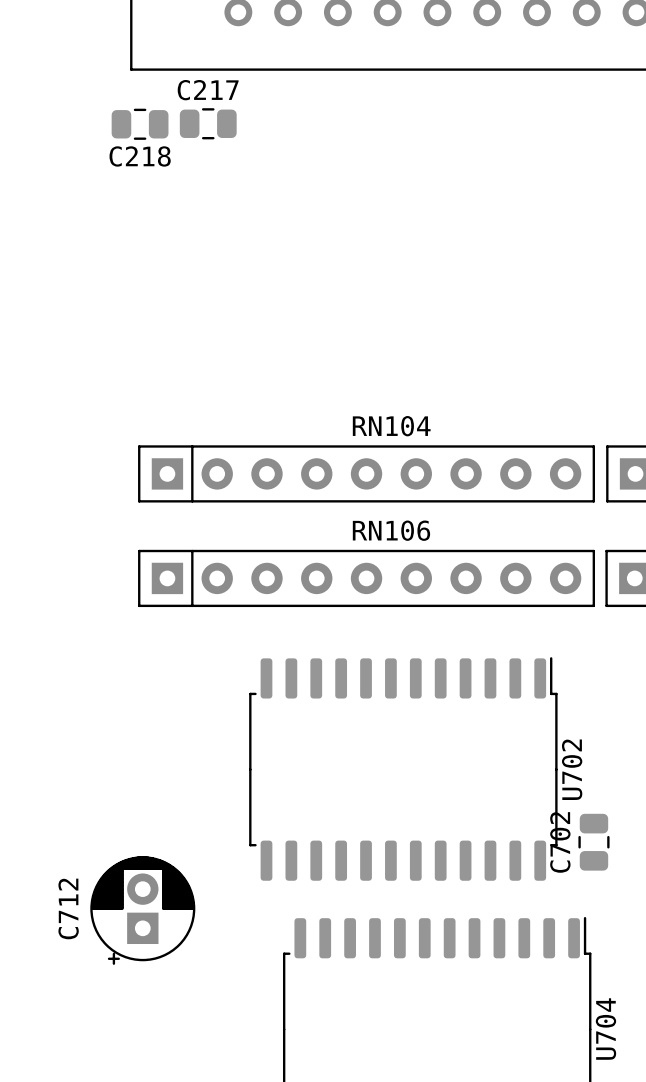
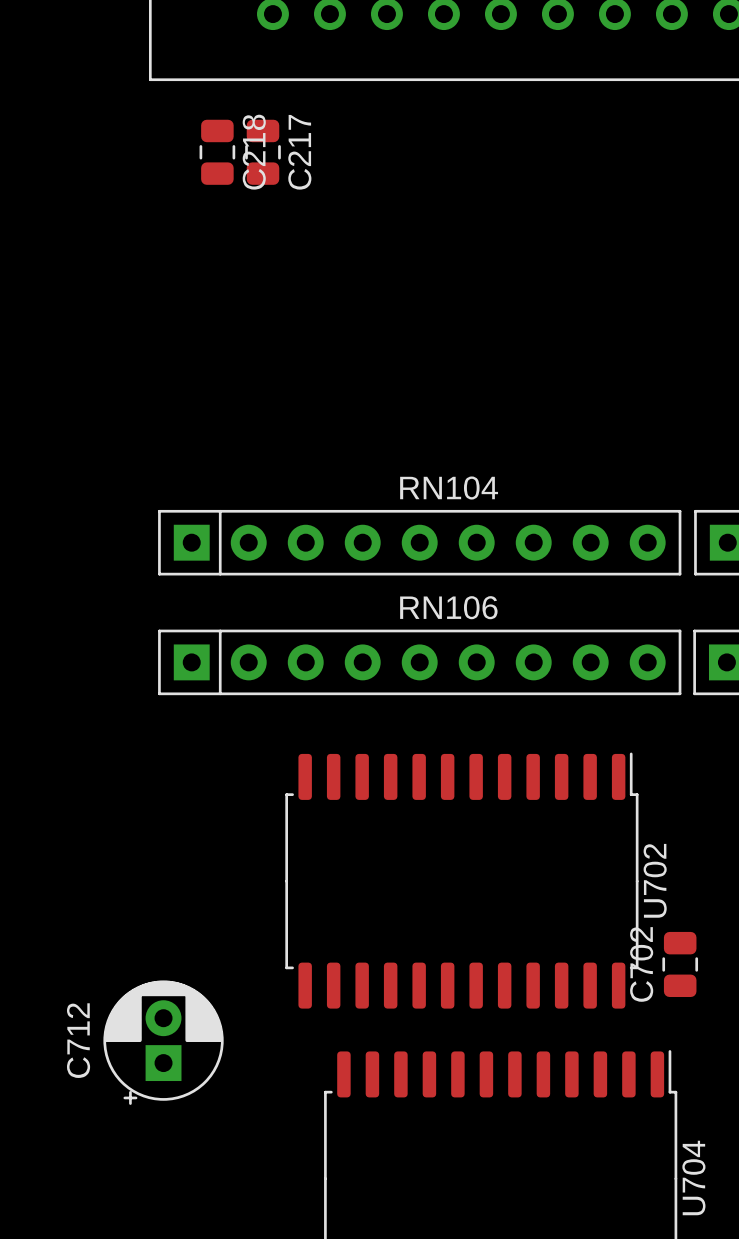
C217 rotation: 0° (208, 123) -> 90° clockwise (262, 152)
C218 rotation: 0° (140, 124) -> 90° clockwise (217, 152)
C218 position: (140, 124) -> (217, 152)
C218 name position: C218 (140, 156) -> C218 (254, 152)

